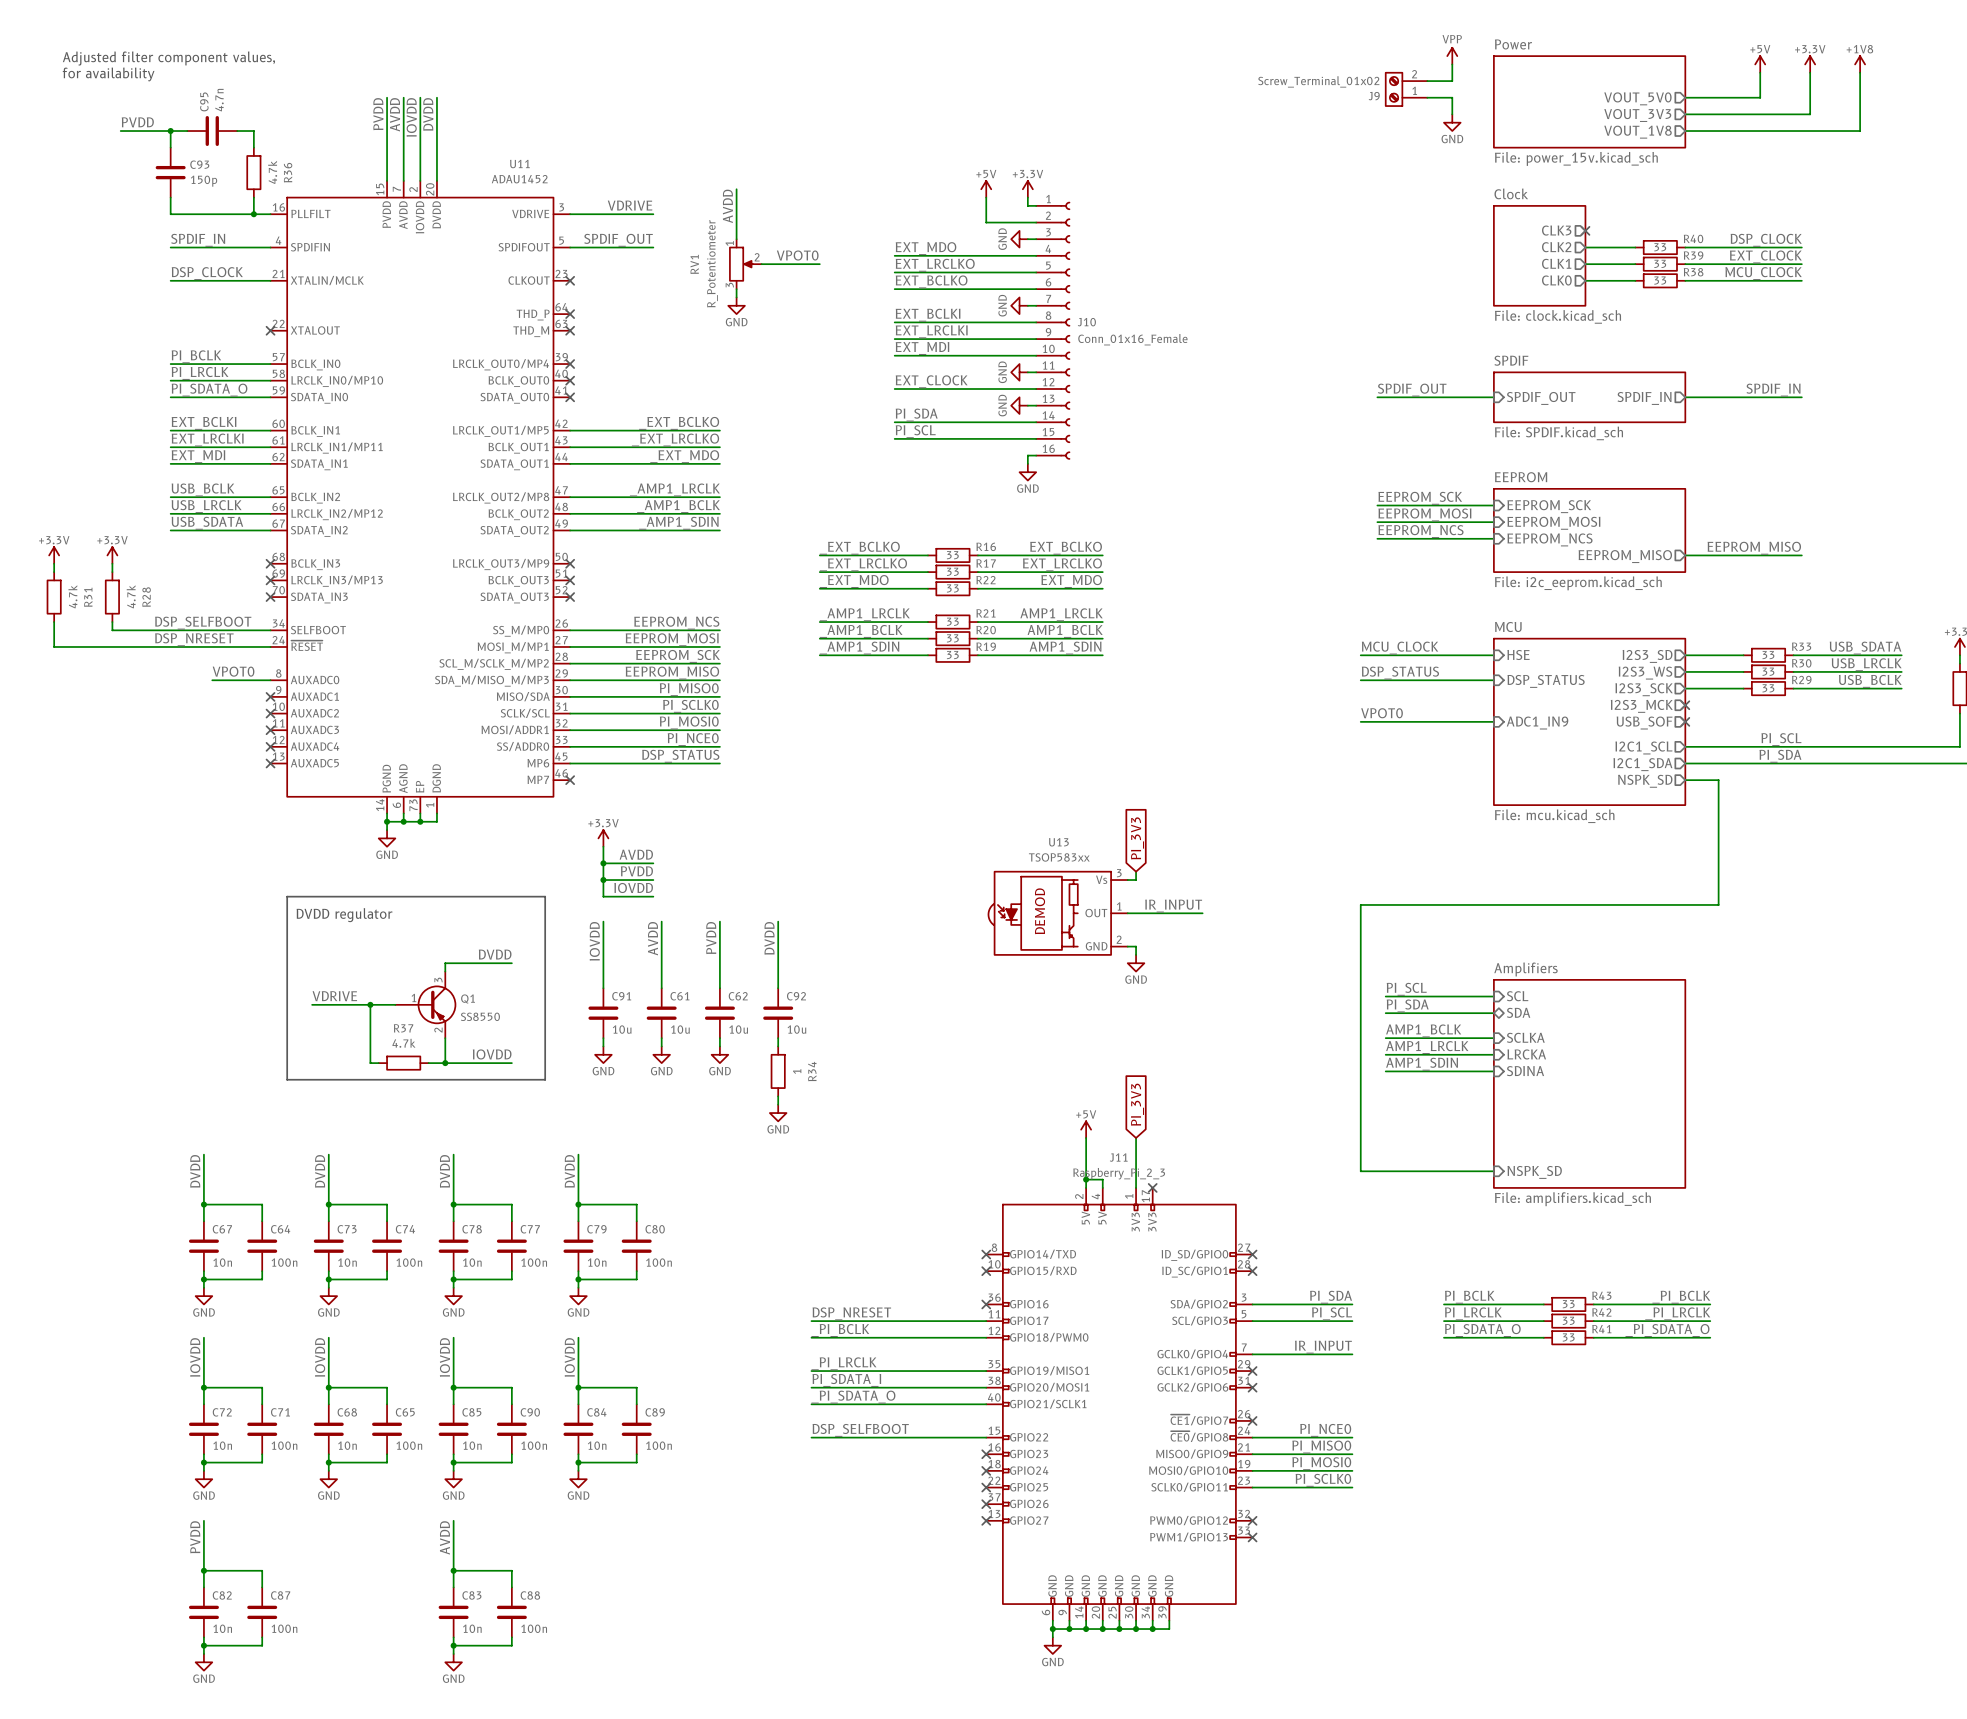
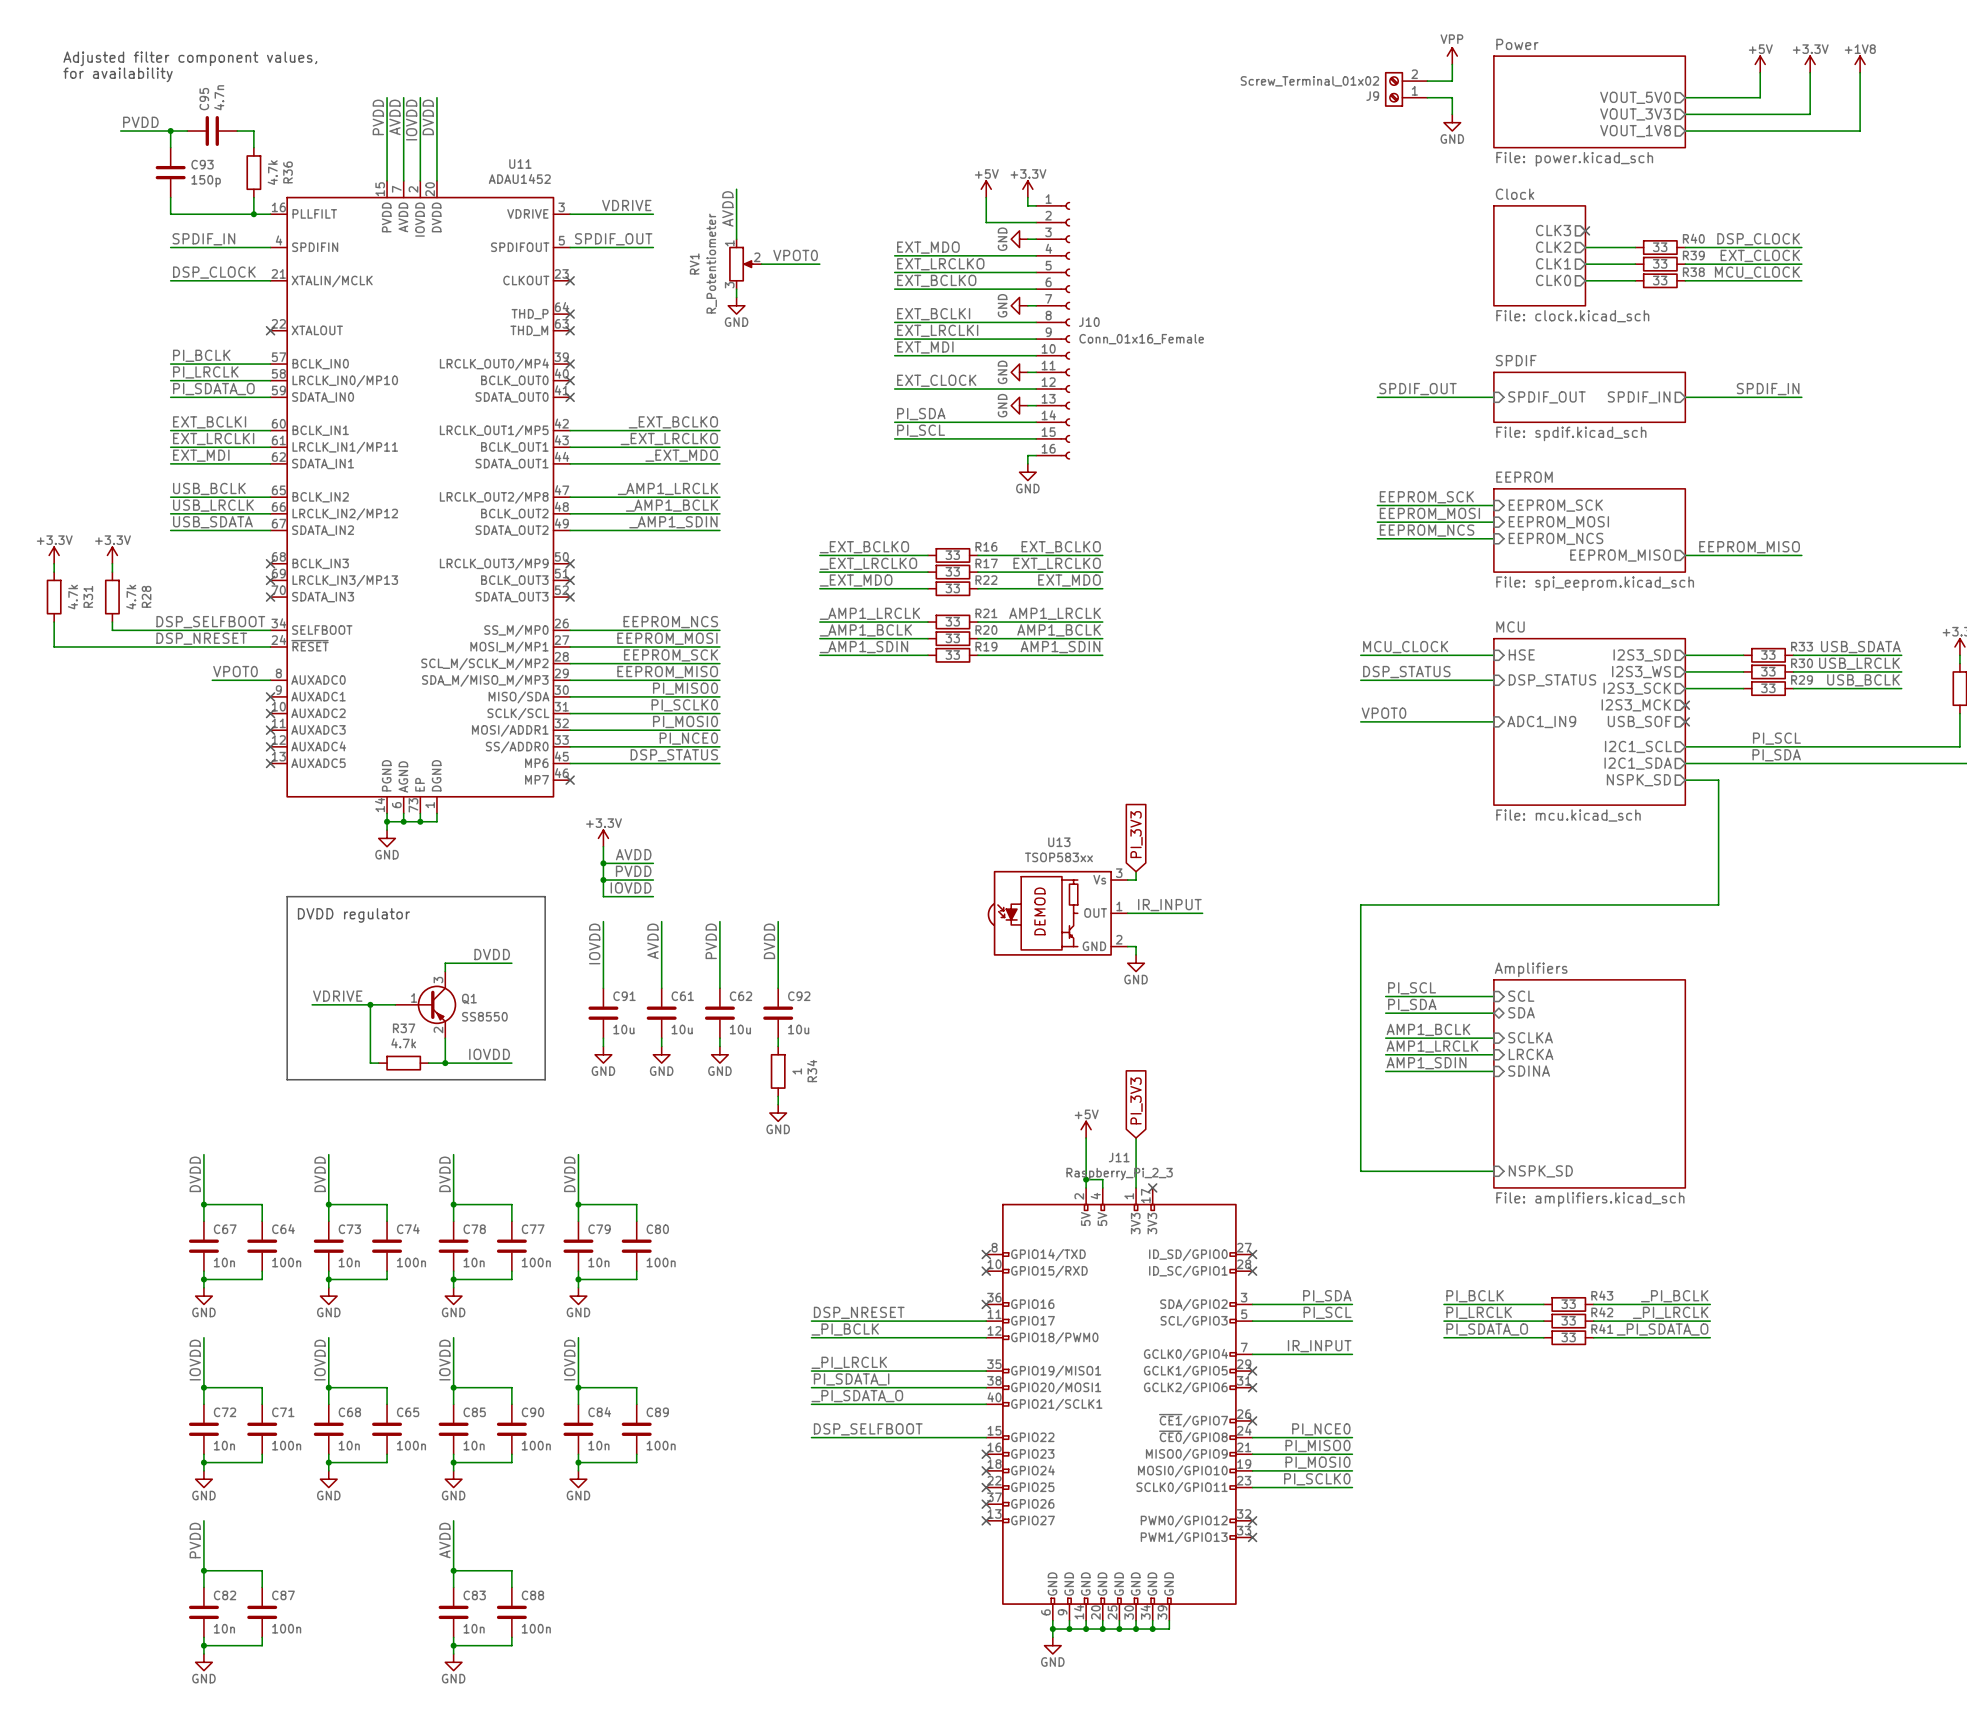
sheet Power value: File: power_15v.kicad_sch (1576, 158) -> File: power.kicad_sch (1574, 159)
sheet SPDIF value: File: SPDIF.kicad_sch (1558, 433) -> File: spdif.kicad_sch (1571, 433)
sheet EEPROM value: File: i2c_eeprom.kicad_sch (1578, 583) -> File: spi_eeprom.kicad_sch (1595, 583)

